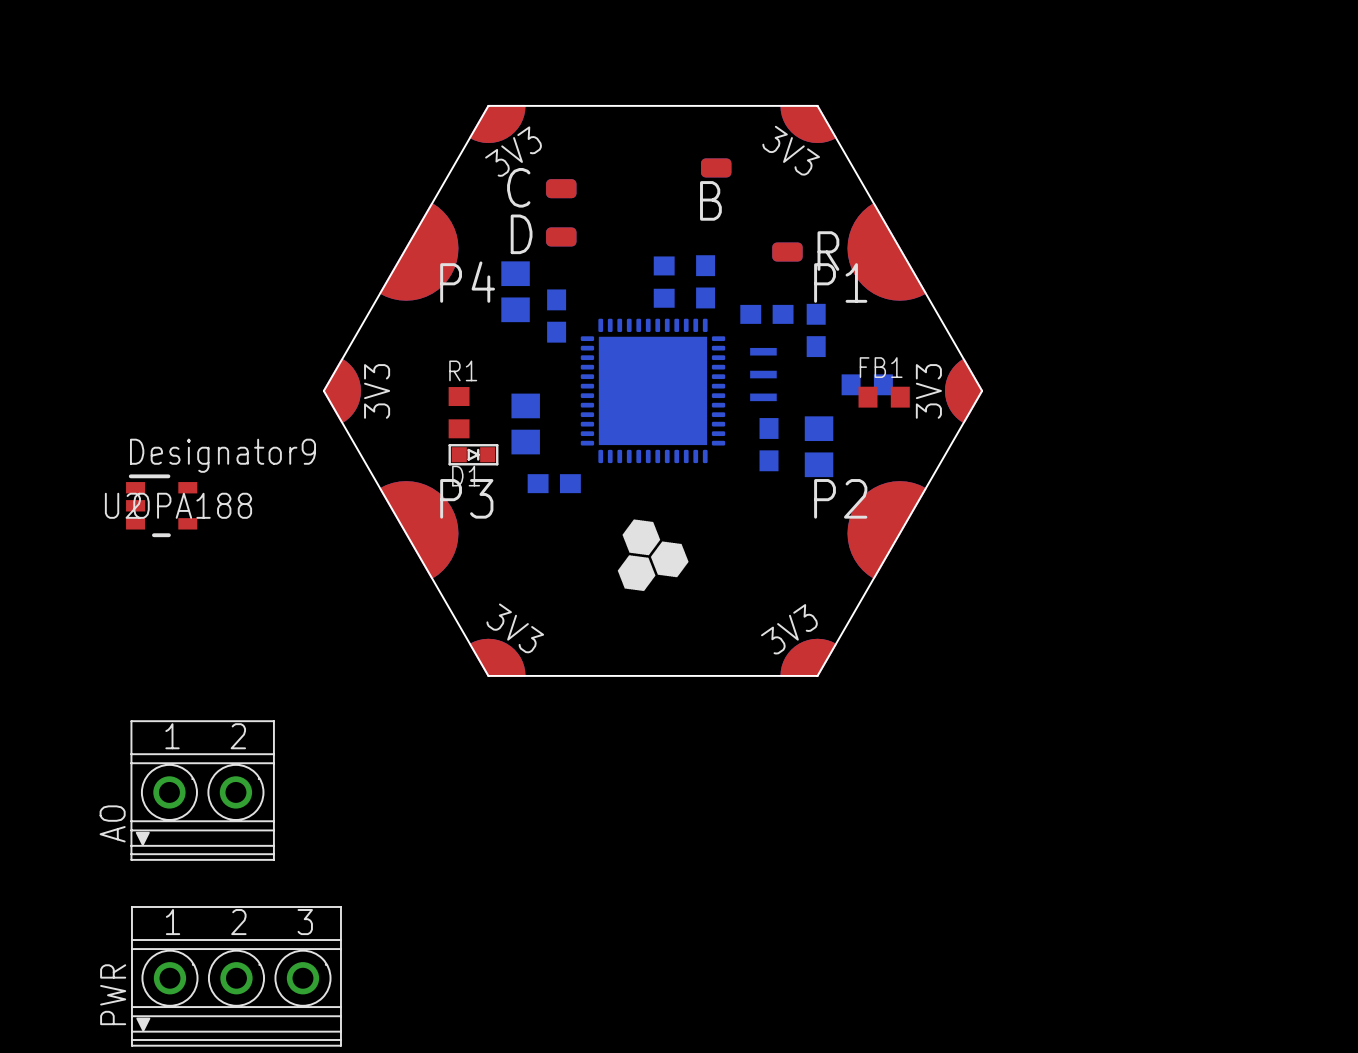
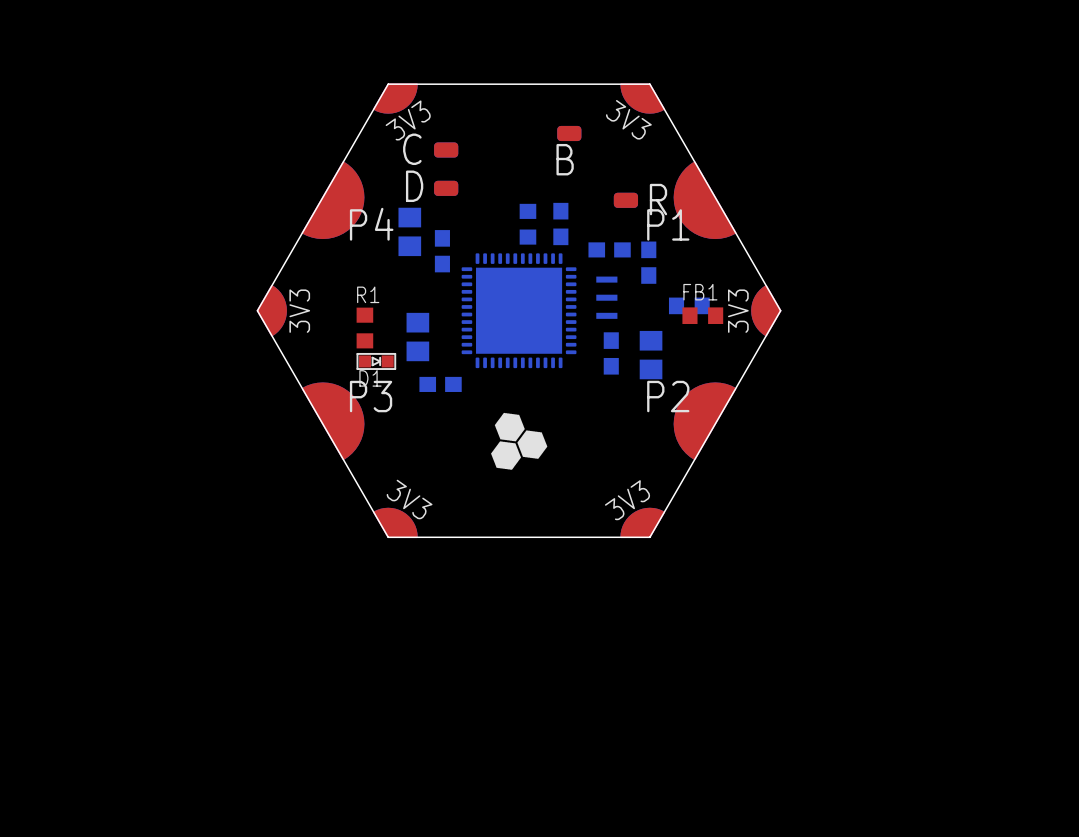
U2: OPA188 (161, 505) -> none
AO: (202, 790) -> none
PWR: (236, 976) -> none

